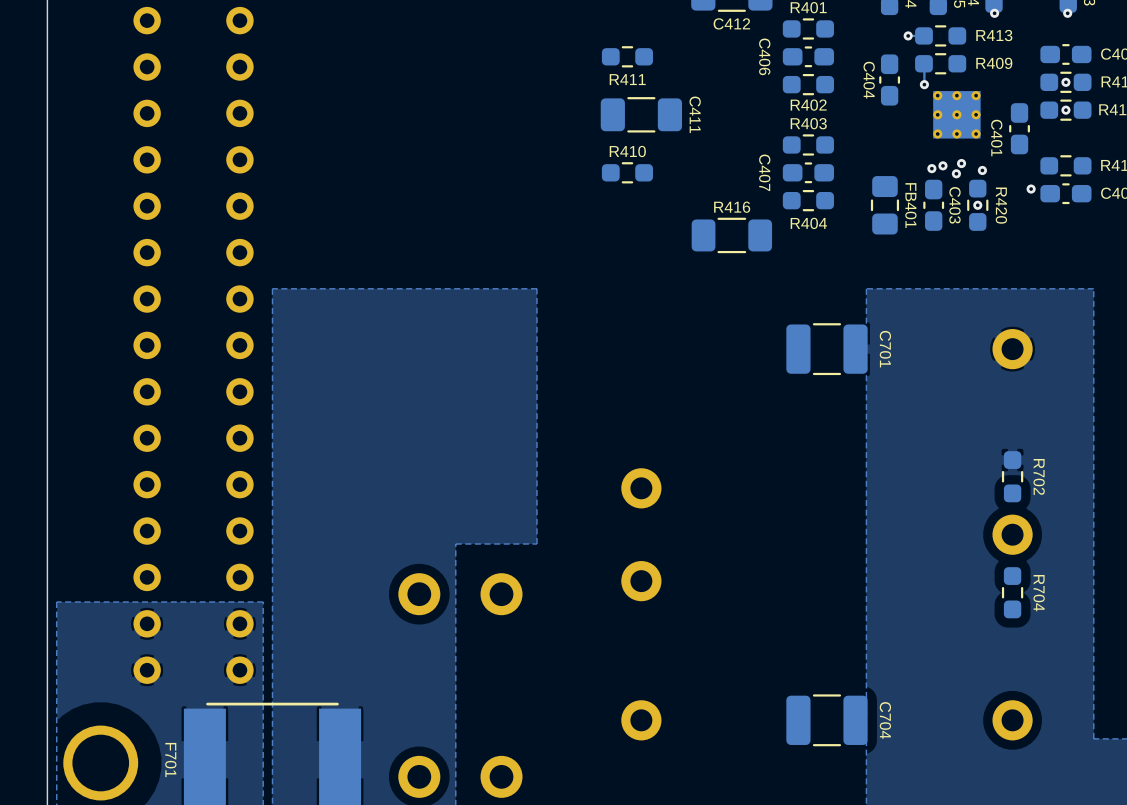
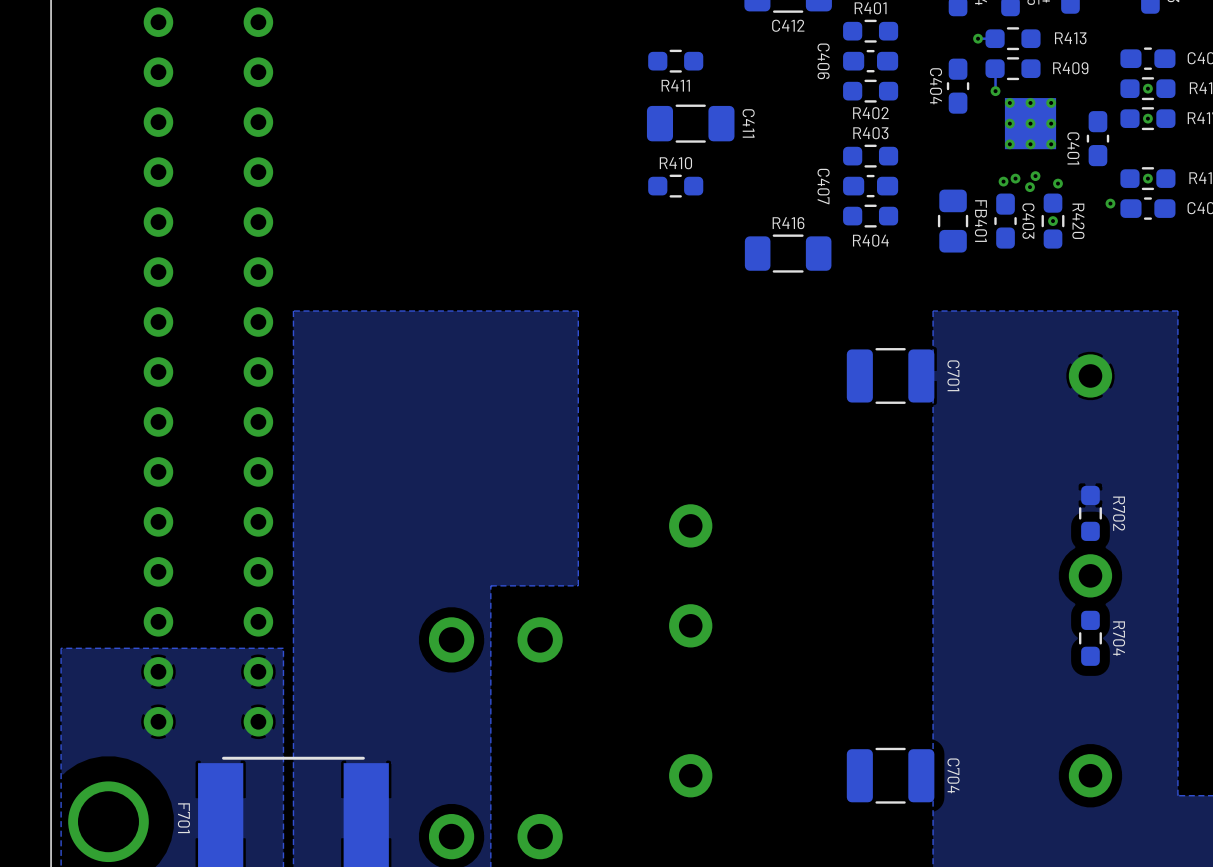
via: (994, 13) -> none
via: (1067, 13) -> none
via: none -> (1147, 178)

